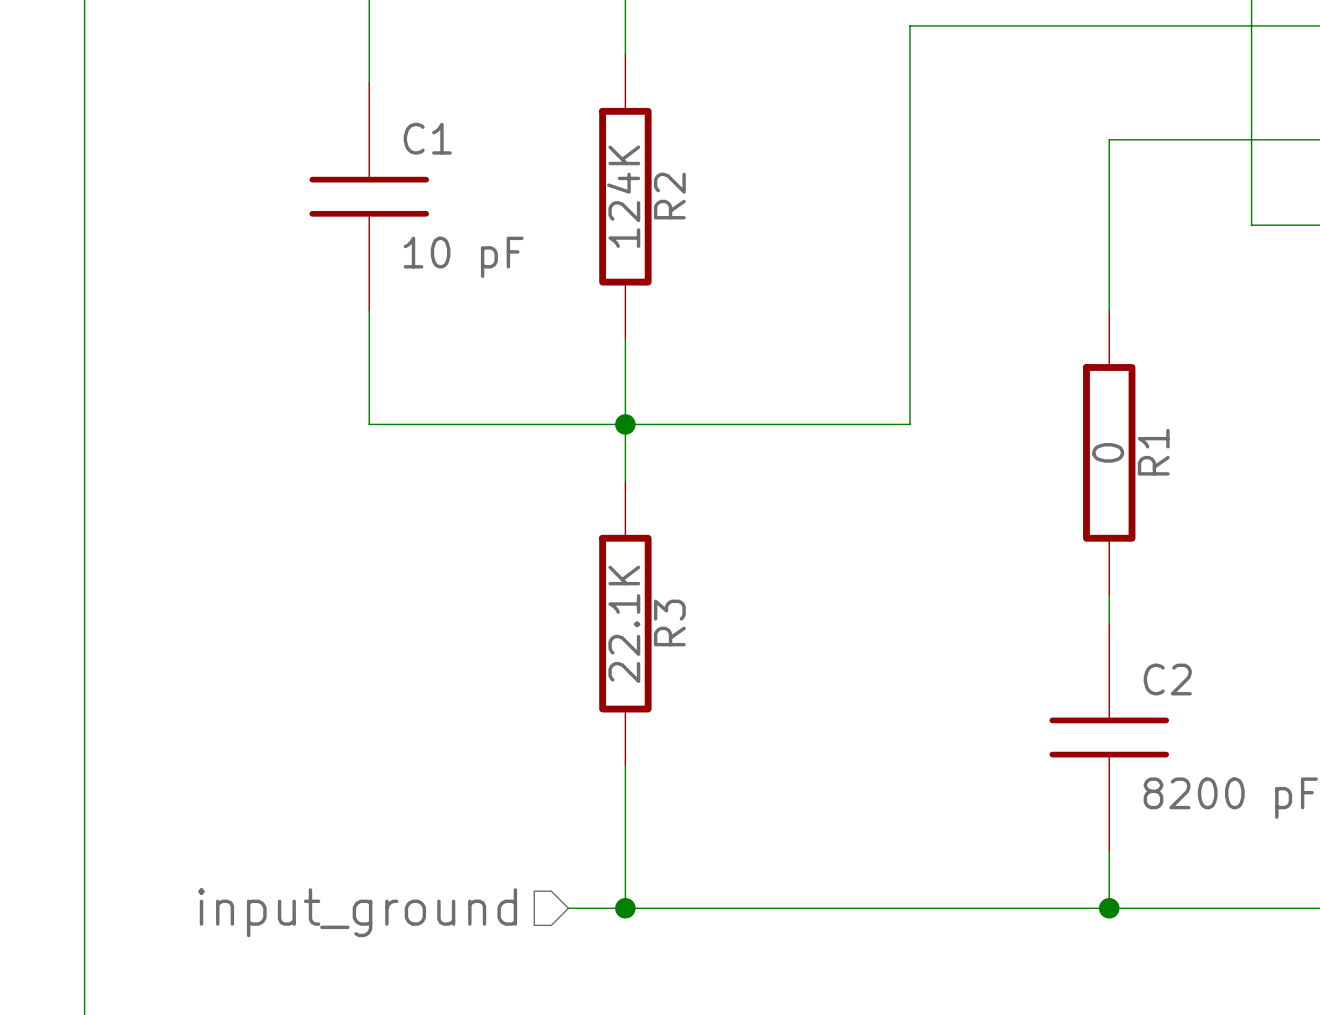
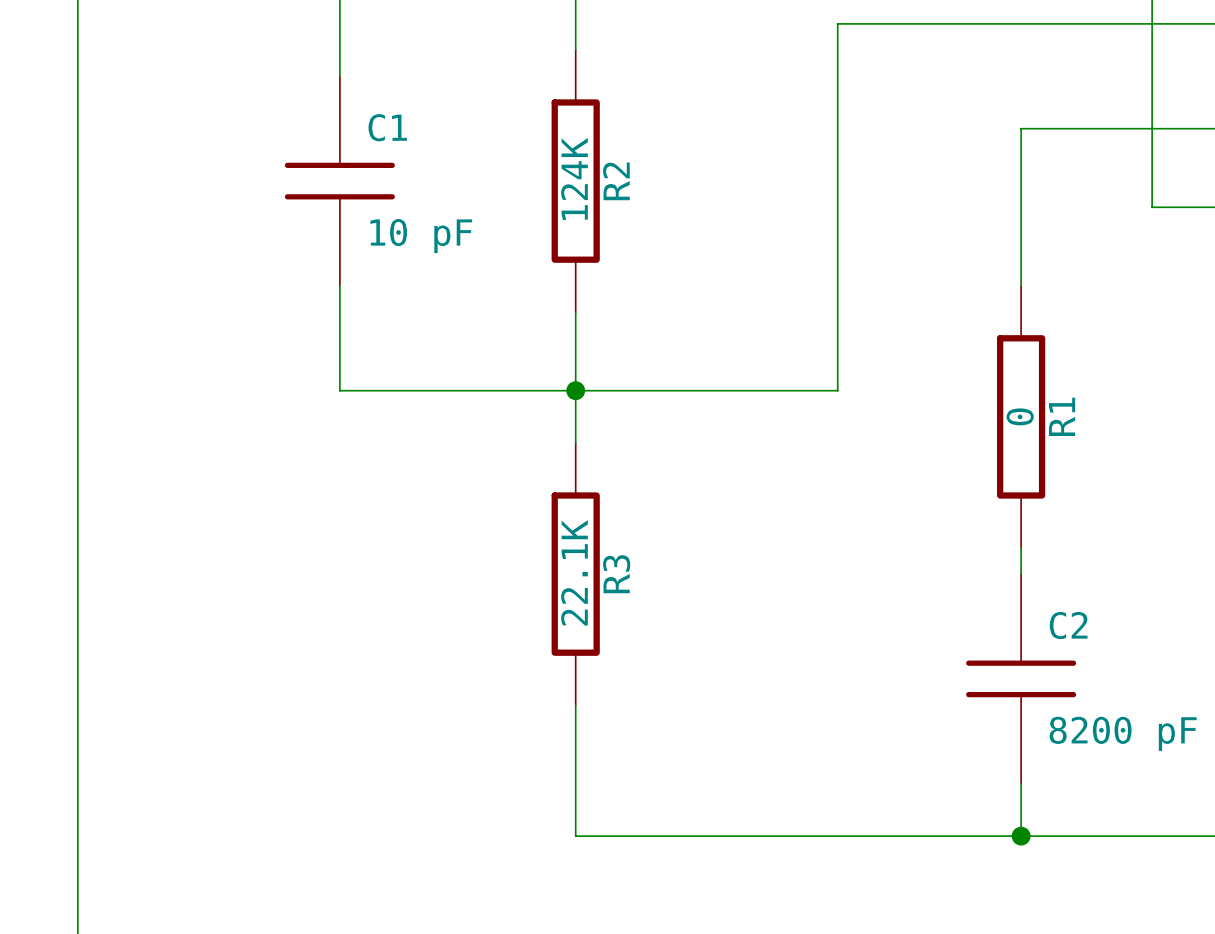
wire: (568, 908) (625, 908) -> none
junction: (625, 908) -> none
hierarchical label: input_ground (357, 912) -> none

